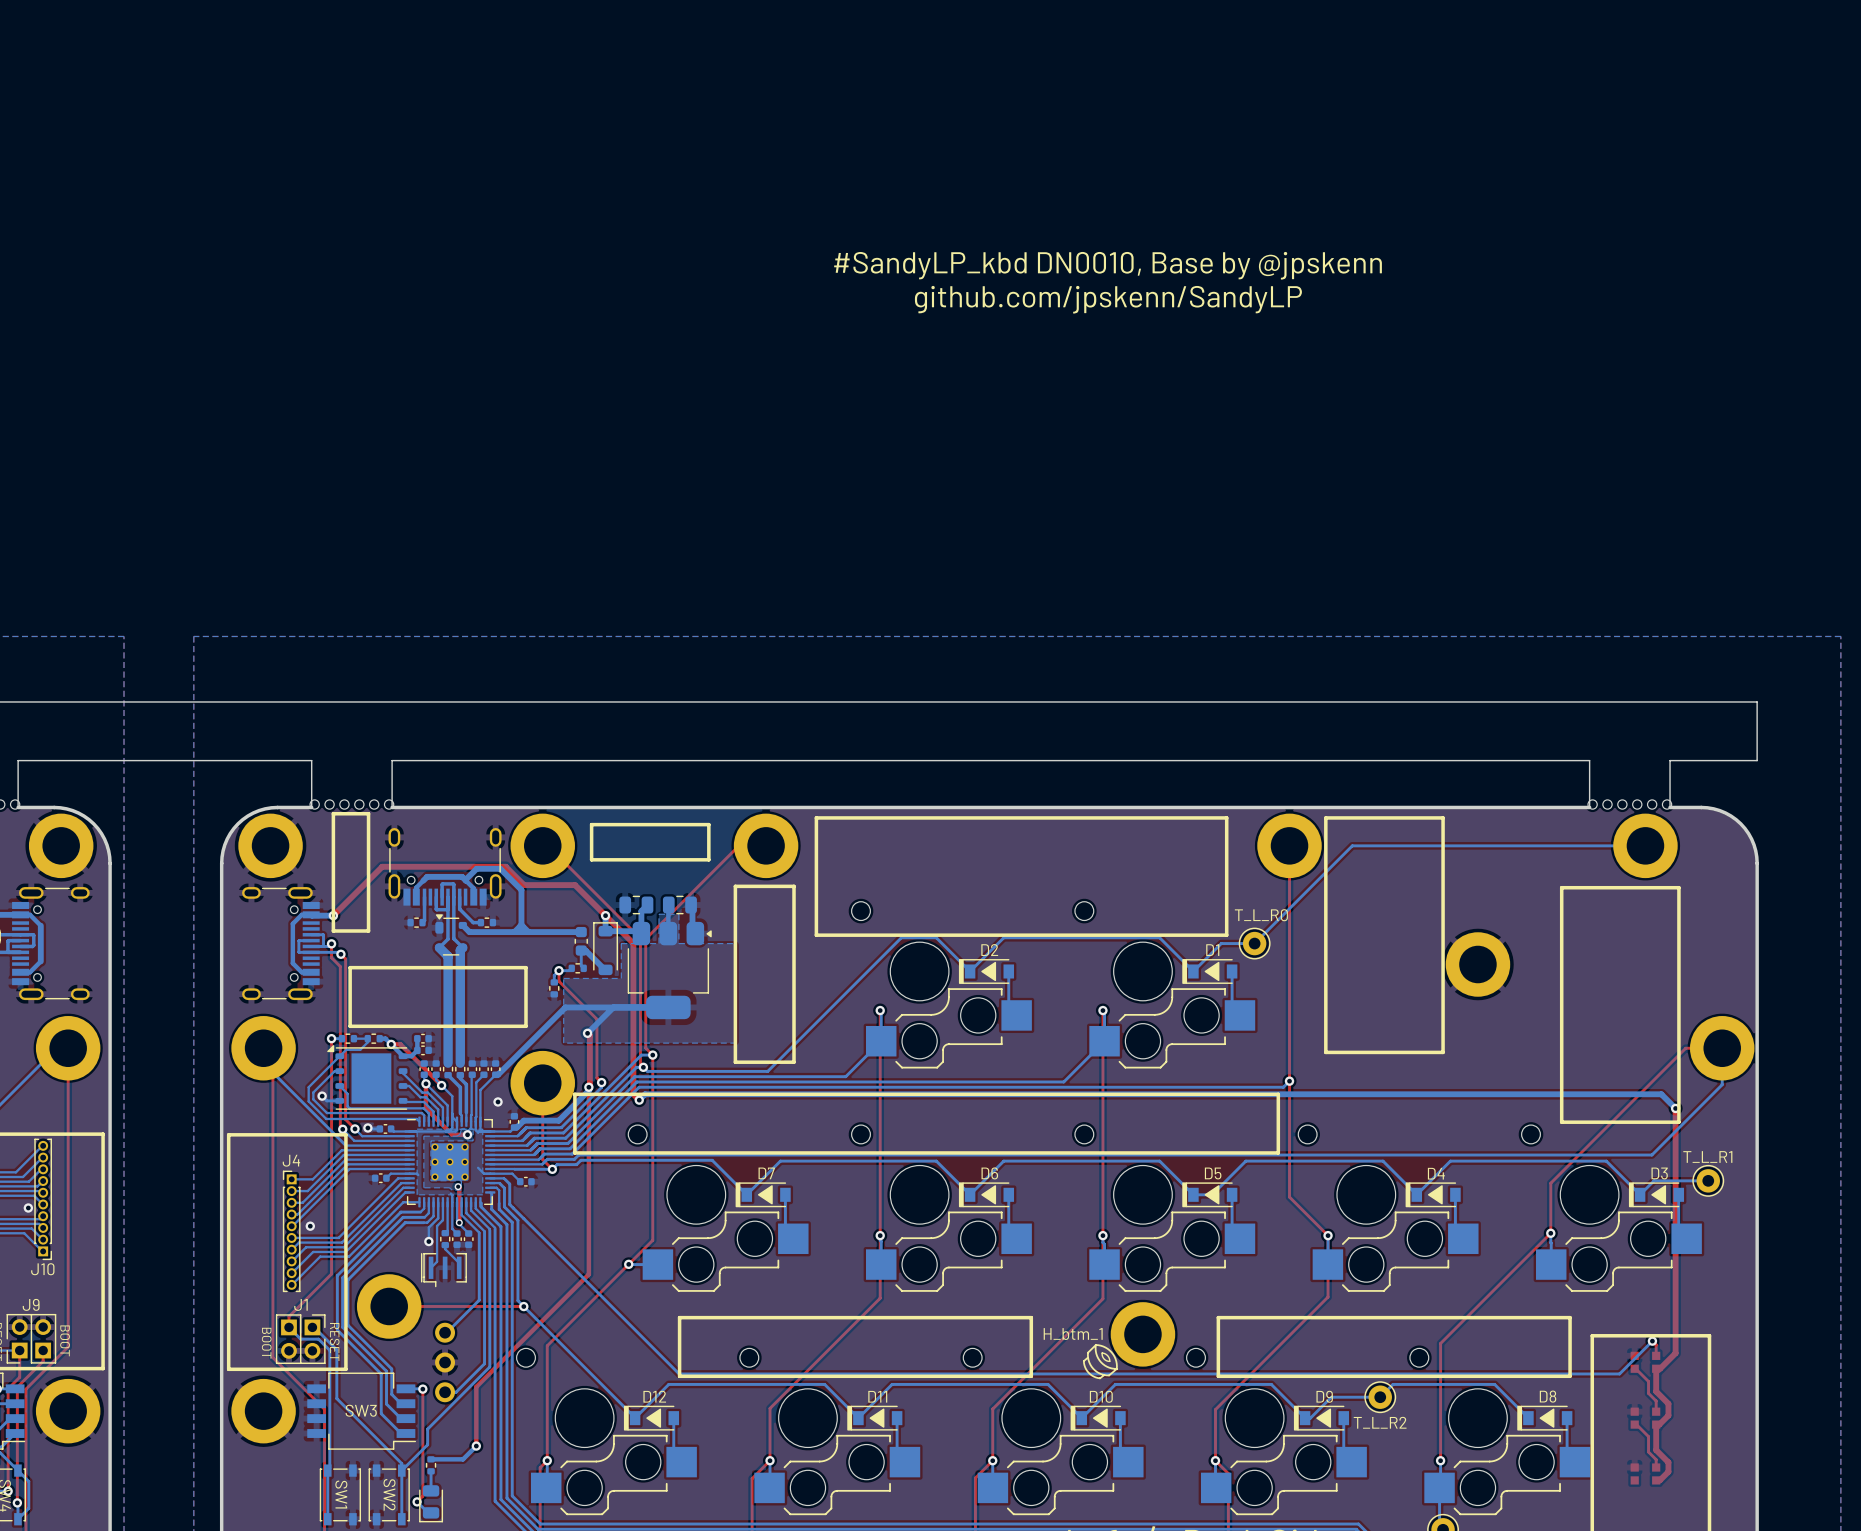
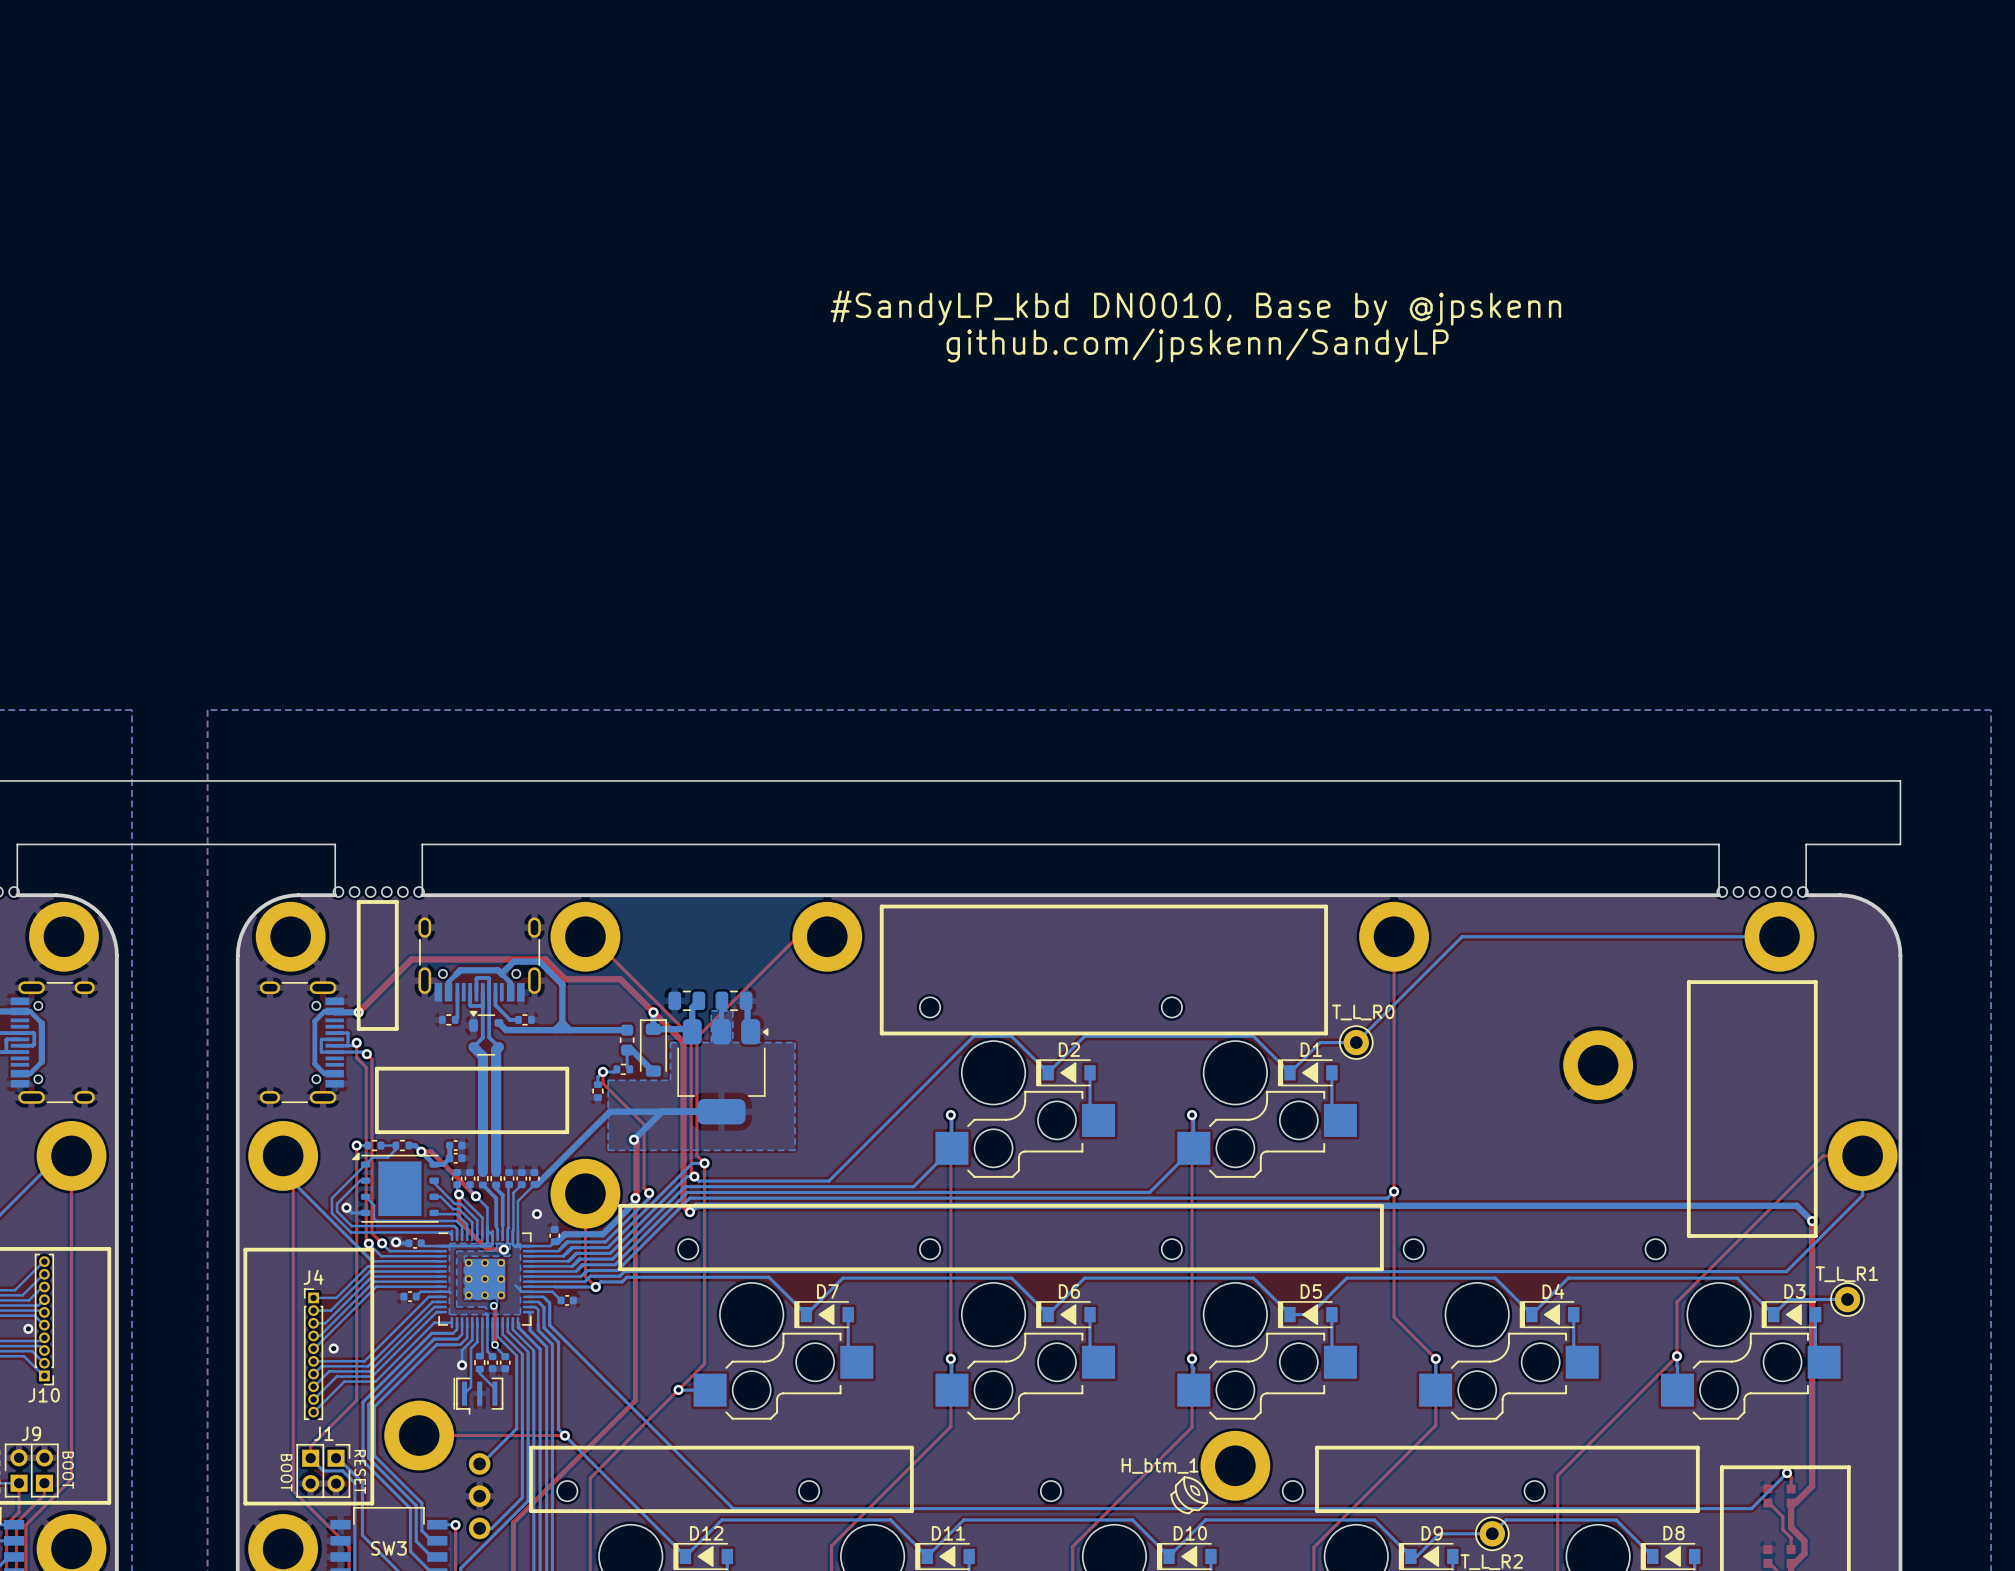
line: (1443, 817) (1325, 817) (1325, 1052) (1443, 1052) (1443, 817) -> none
line: (708, 824) (591, 824) (591, 859) (708, 859) (708, 824) -> none
line: (794, 886) (735, 886) (735, 1062) (794, 1062) (794, 886) -> none
line: (679, 1317) (679, 1376) -> (733, 1447) (531, 1447) (531, 1511) (733, 1511)
line: (844, 1317) (1031, 1317) (1031, 1376) (844, 1376) -> (911, 1447) (911, 1511)

